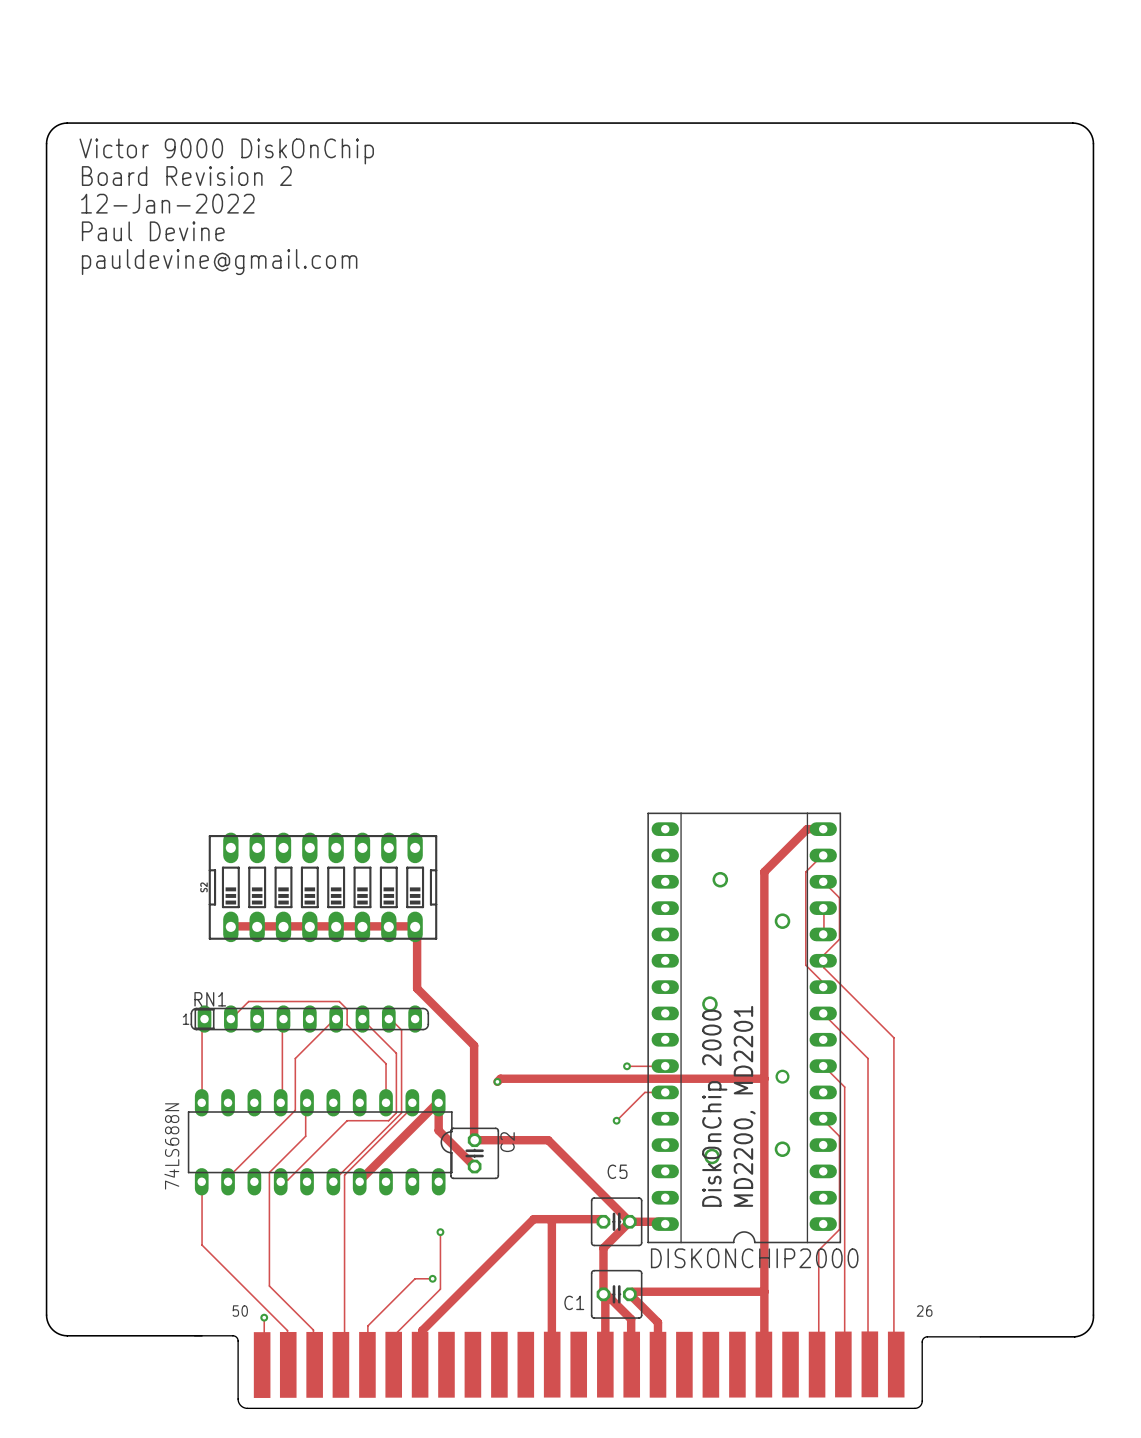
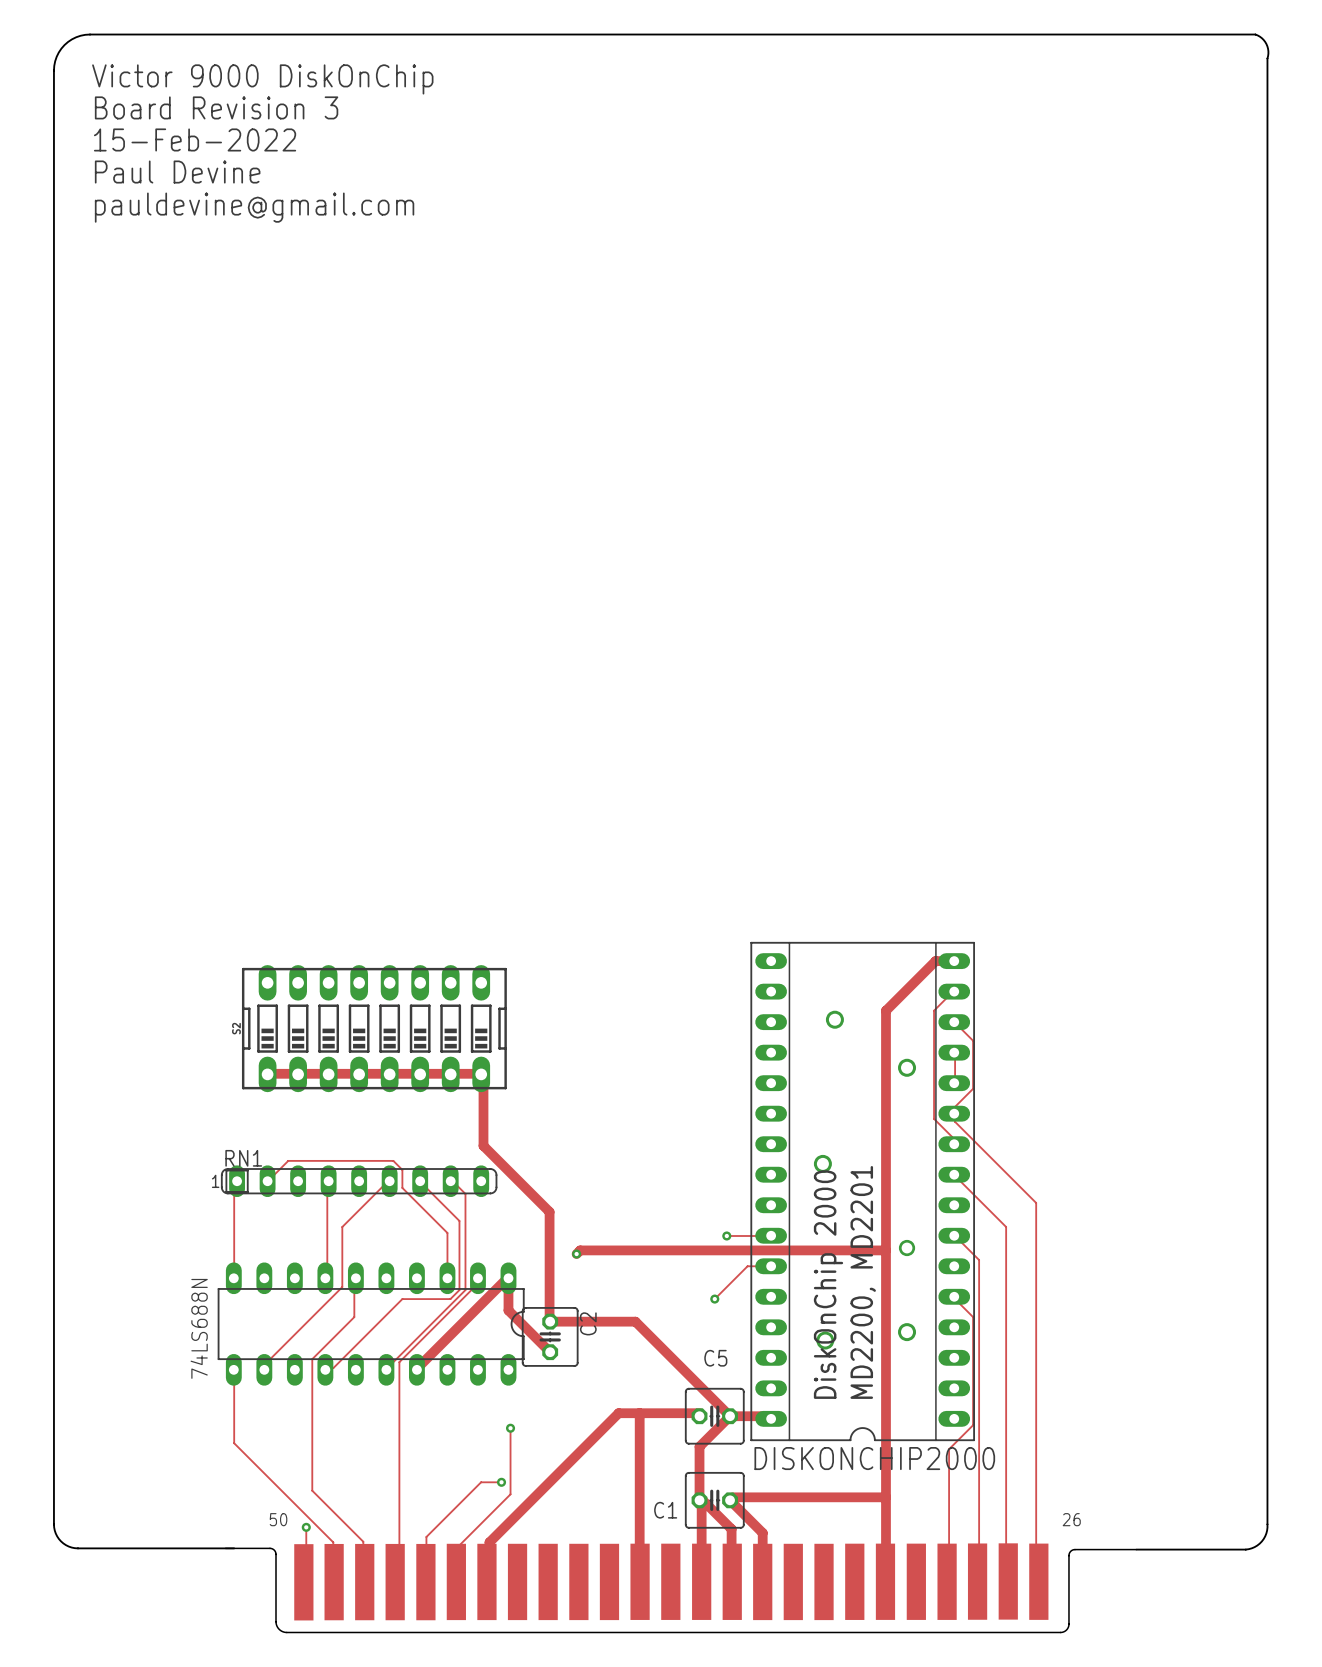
text: none -> Victor 9000 DiskOnChip (262, 79)
text: none -> Board Revision 3 (216, 107)
text: none -> 15-Feb-2022 (195, 139)
board edge: (46, 143) (48, 135) (52, 129) (59, 124) (67, 123) (1072, 123) (1080, 124) (1087, 129) (1091, 135) (1093, 143) -> (53, 166) (55, 61) (61, 48) (68, 41) (80, 35) (90, 34) (1255, 34) (1263, 39) (1268, 51) (1267, 166)
text: Victor 9000 DiskOnChip (226, 151) -> Paul Devine (177, 172)
text: Board Revision 2 (186, 176) -> pauldevine@gmail.com (254, 207)
text: 12-Jan-2022 (167, 203) -> none
text: Paul Devine (153, 231) -> none
text: pauldevine@gmail.com (219, 262) -> none

